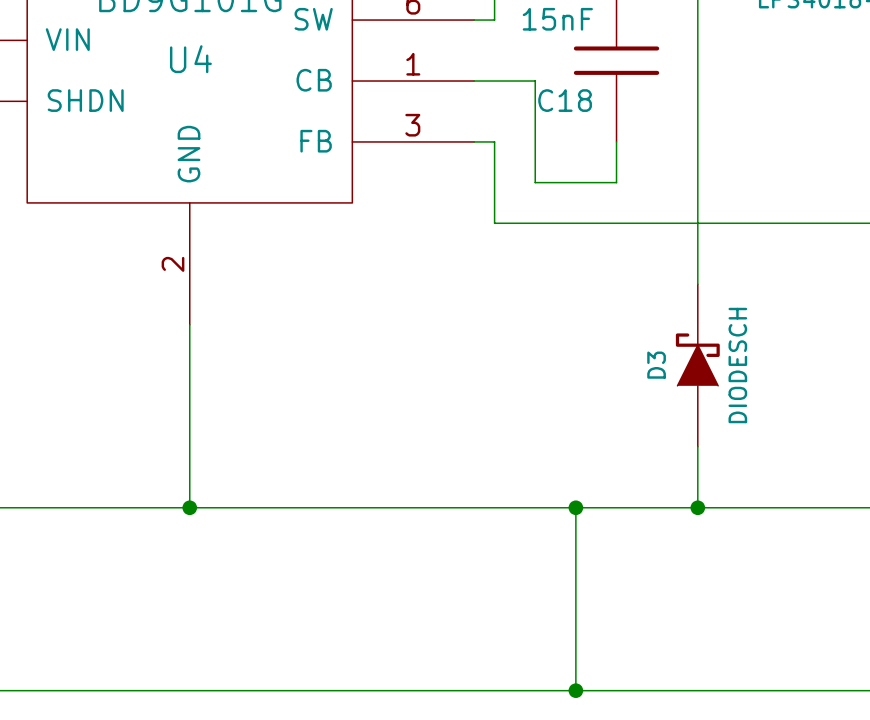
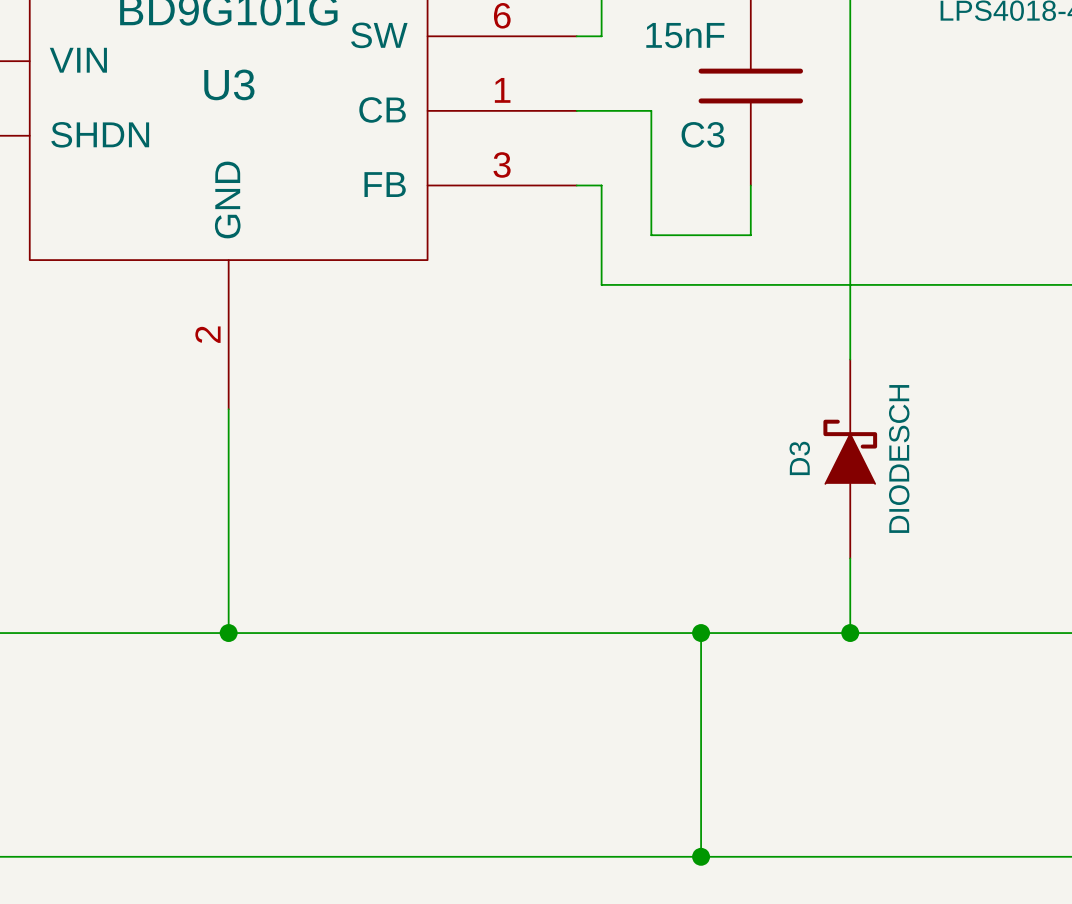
U4 name: U4 (190, 59) -> U3 (229, 84)
C18 name: C18 (565, 100) -> C3 (702, 134)

